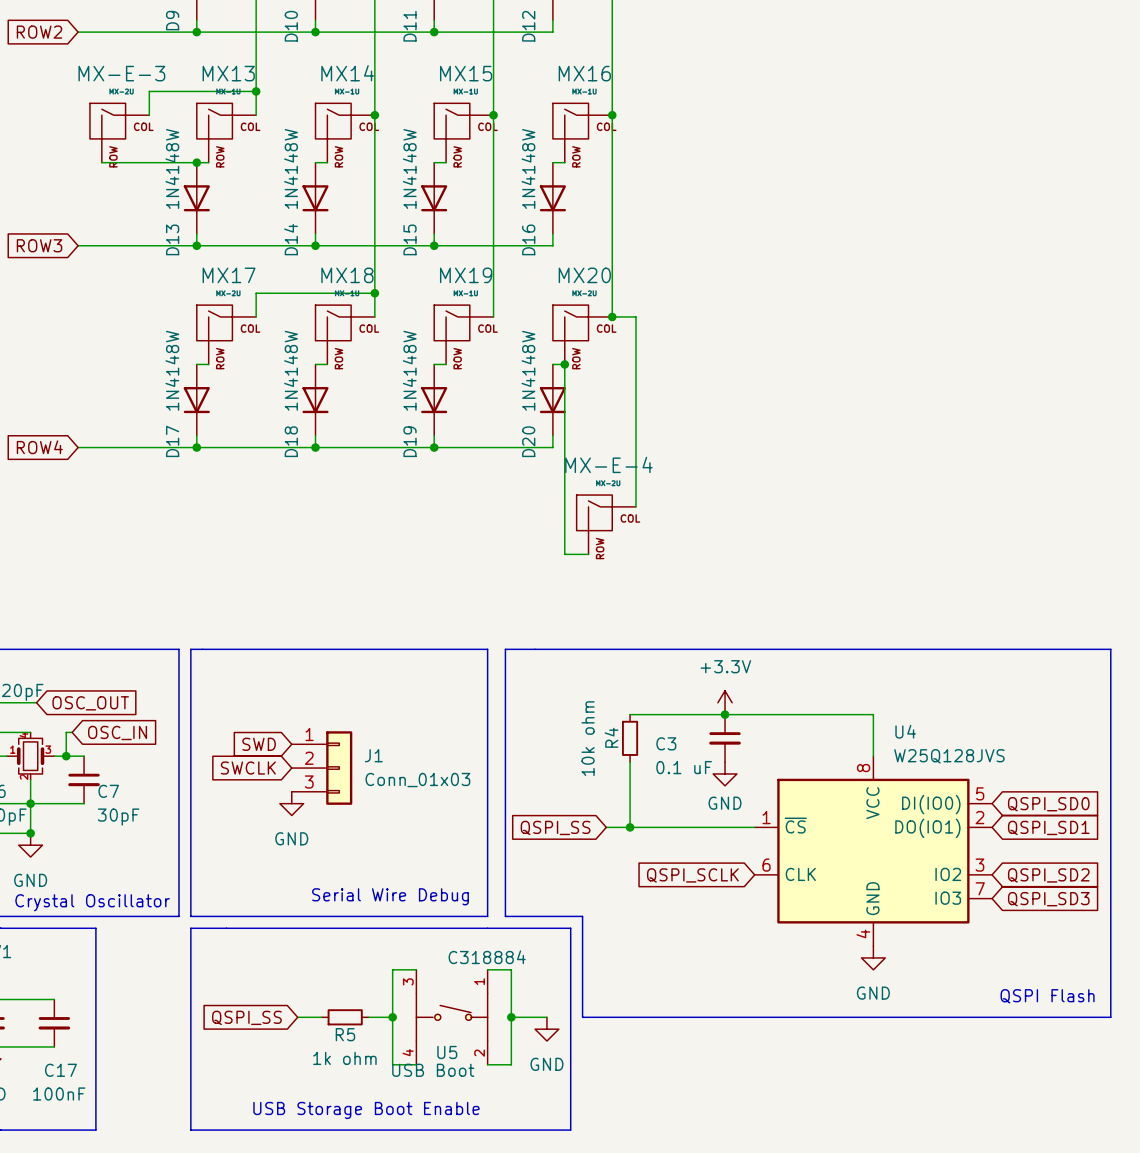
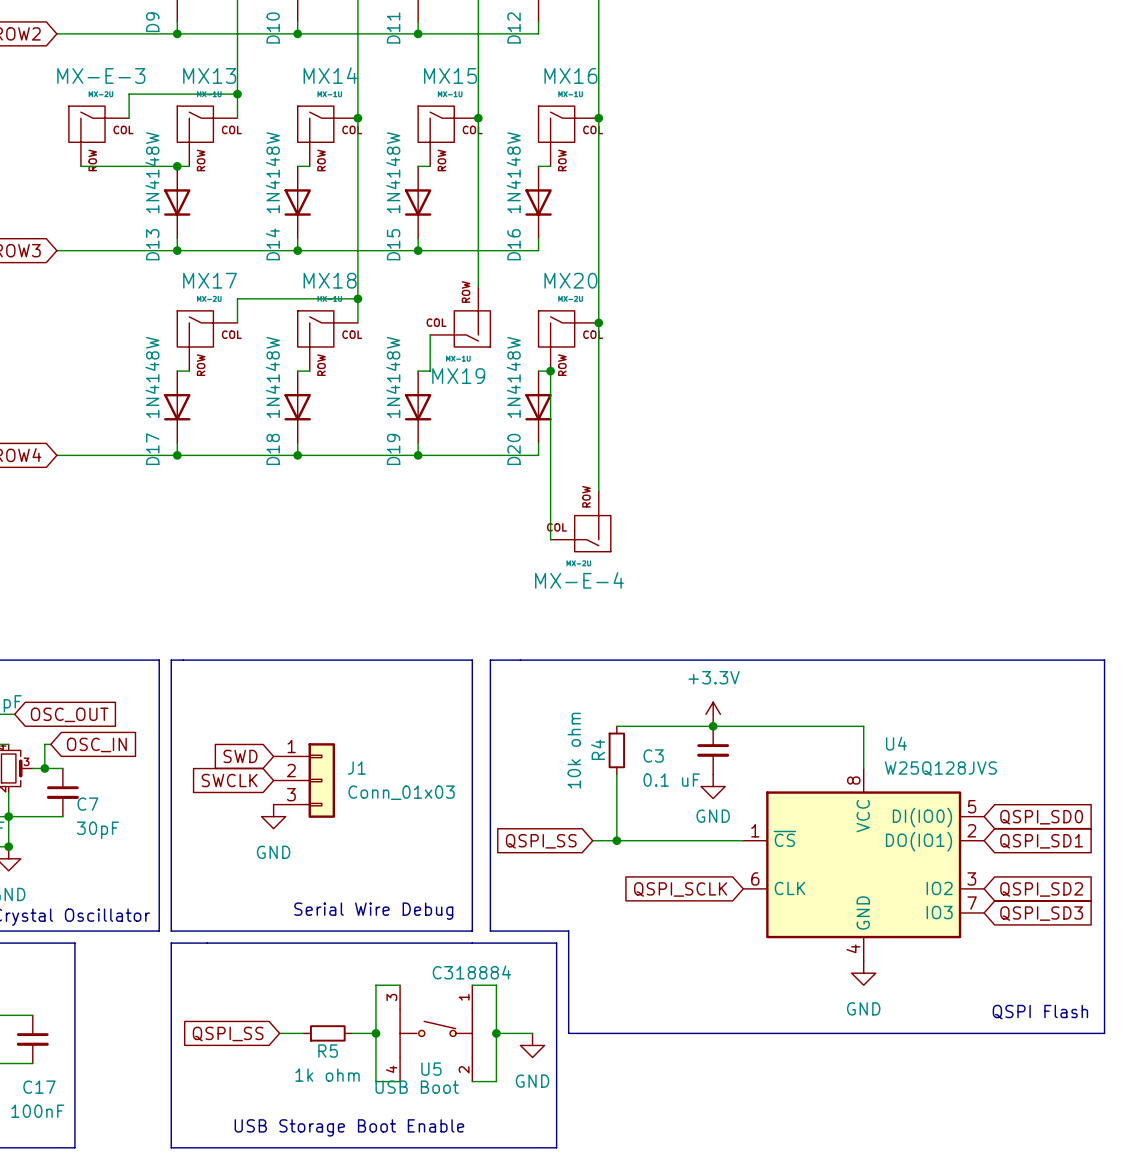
wire: (612, 316) (635, 316) (635, 506) -> (598, 322) (598, 491)
MX19 rotation: 0° (452, 323) -> 180° (472, 328)
MX-E-4 rotation: 0° (594, 513) -> 180° (592, 533)
wire: (564, 530) (564, 554) (588, 554) -> none

